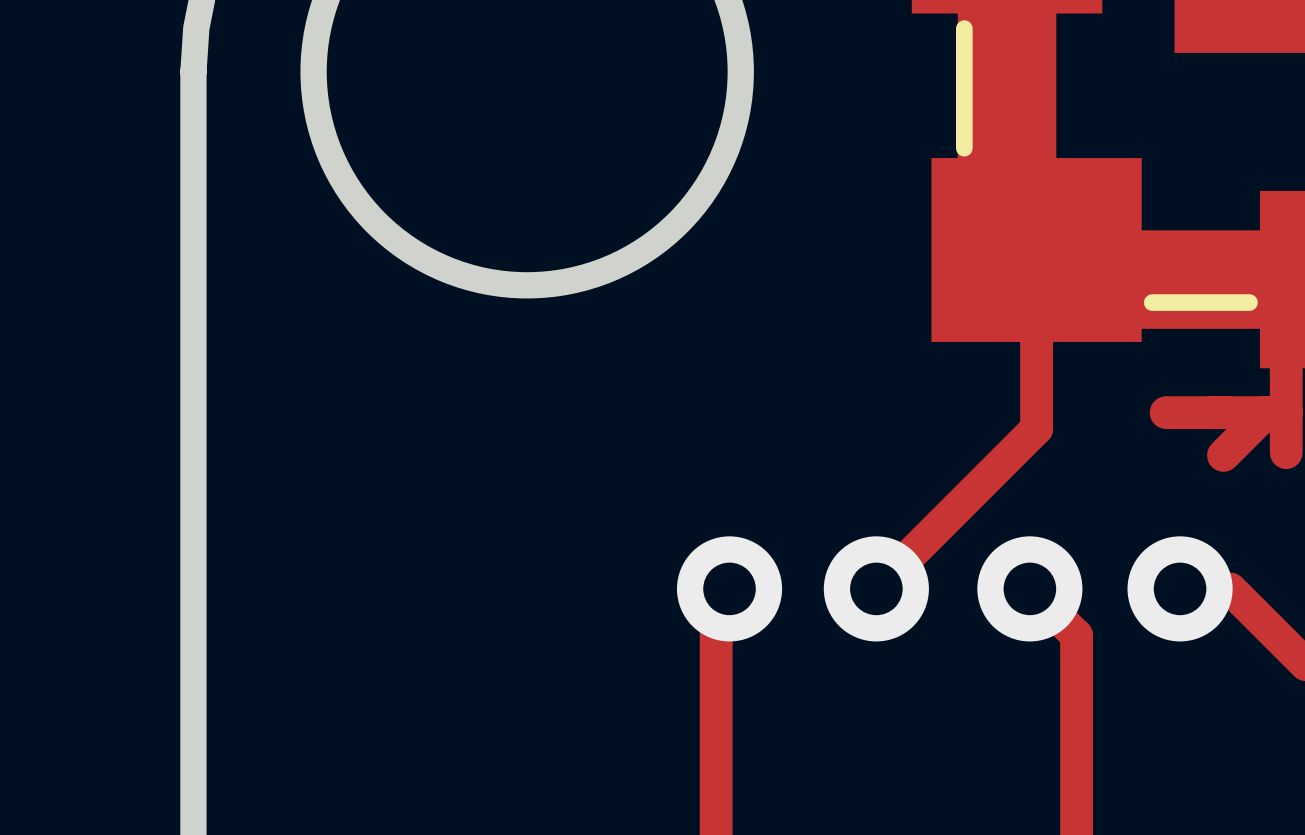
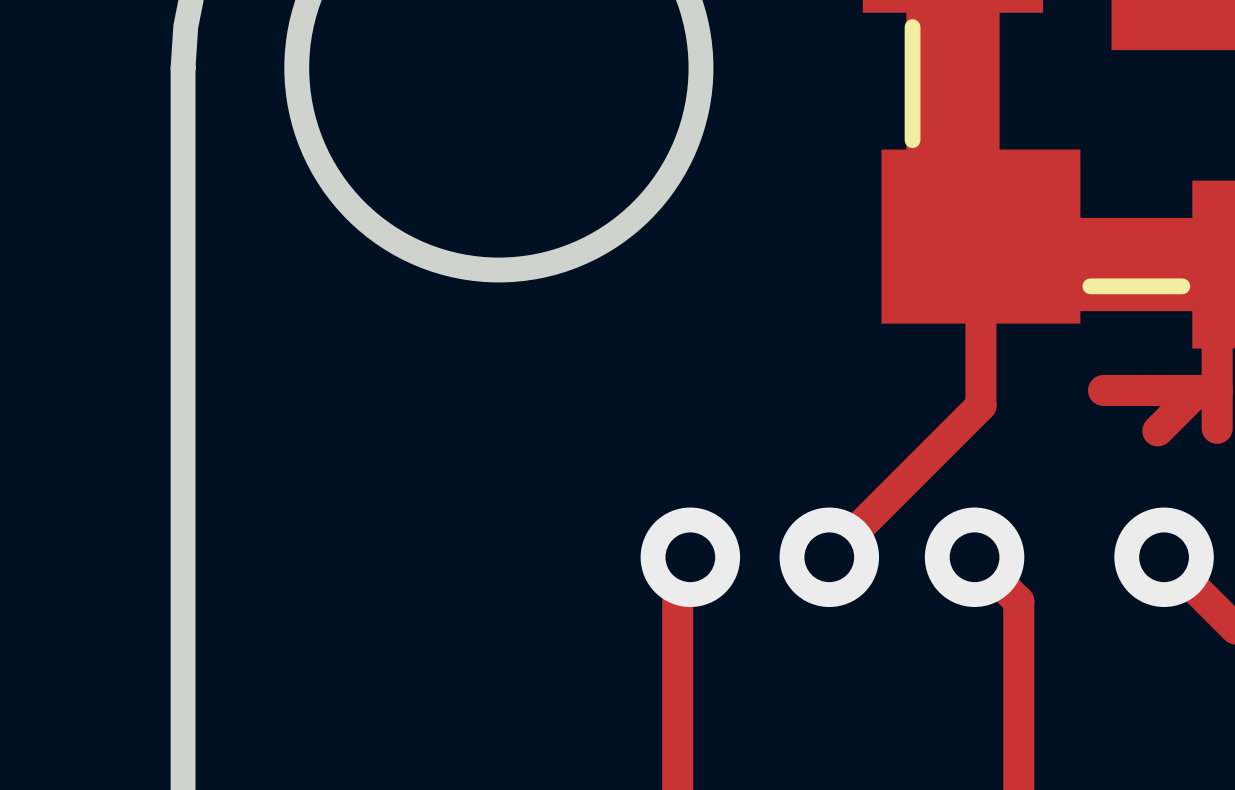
via position: (1180, 588) -> (1164, 557)

